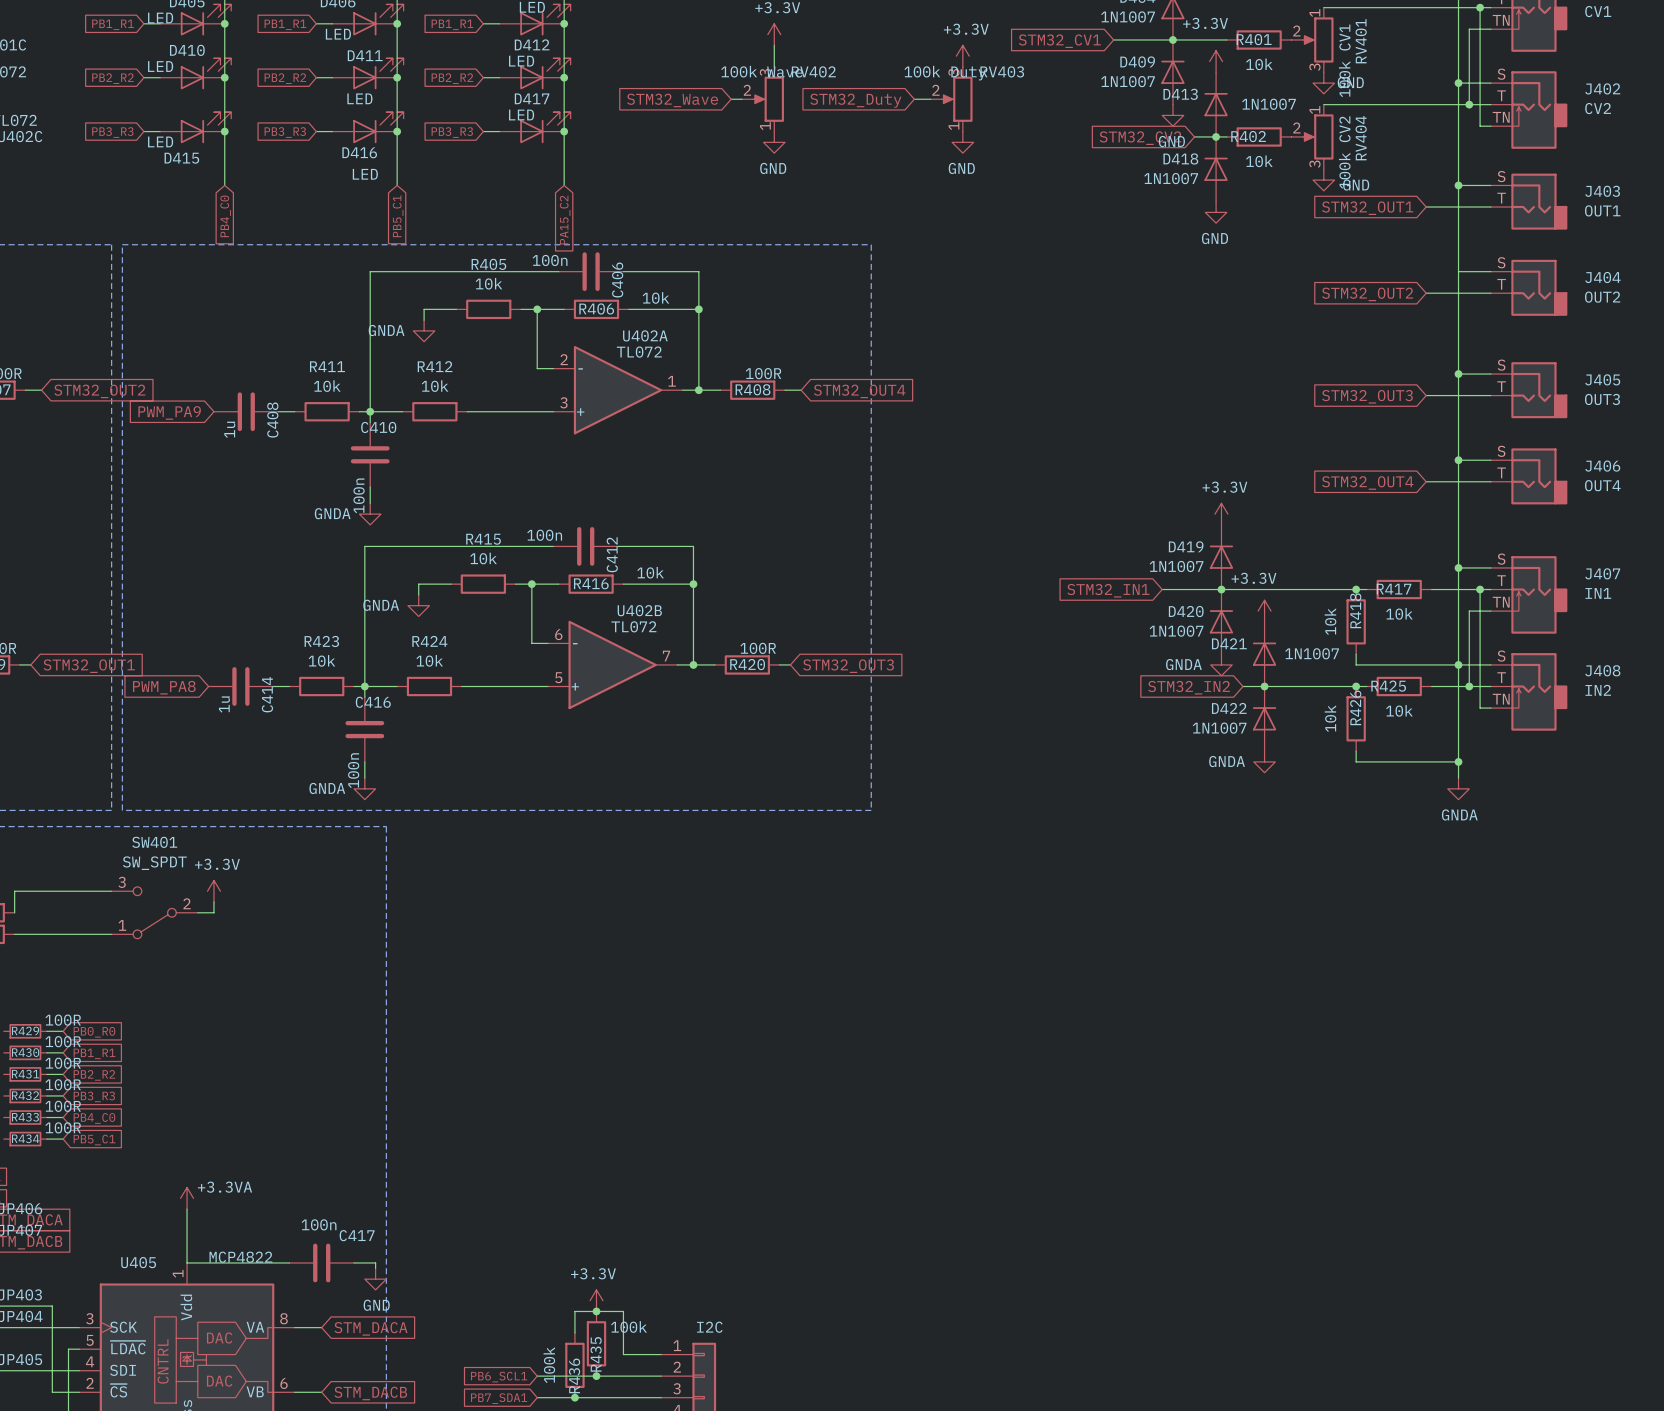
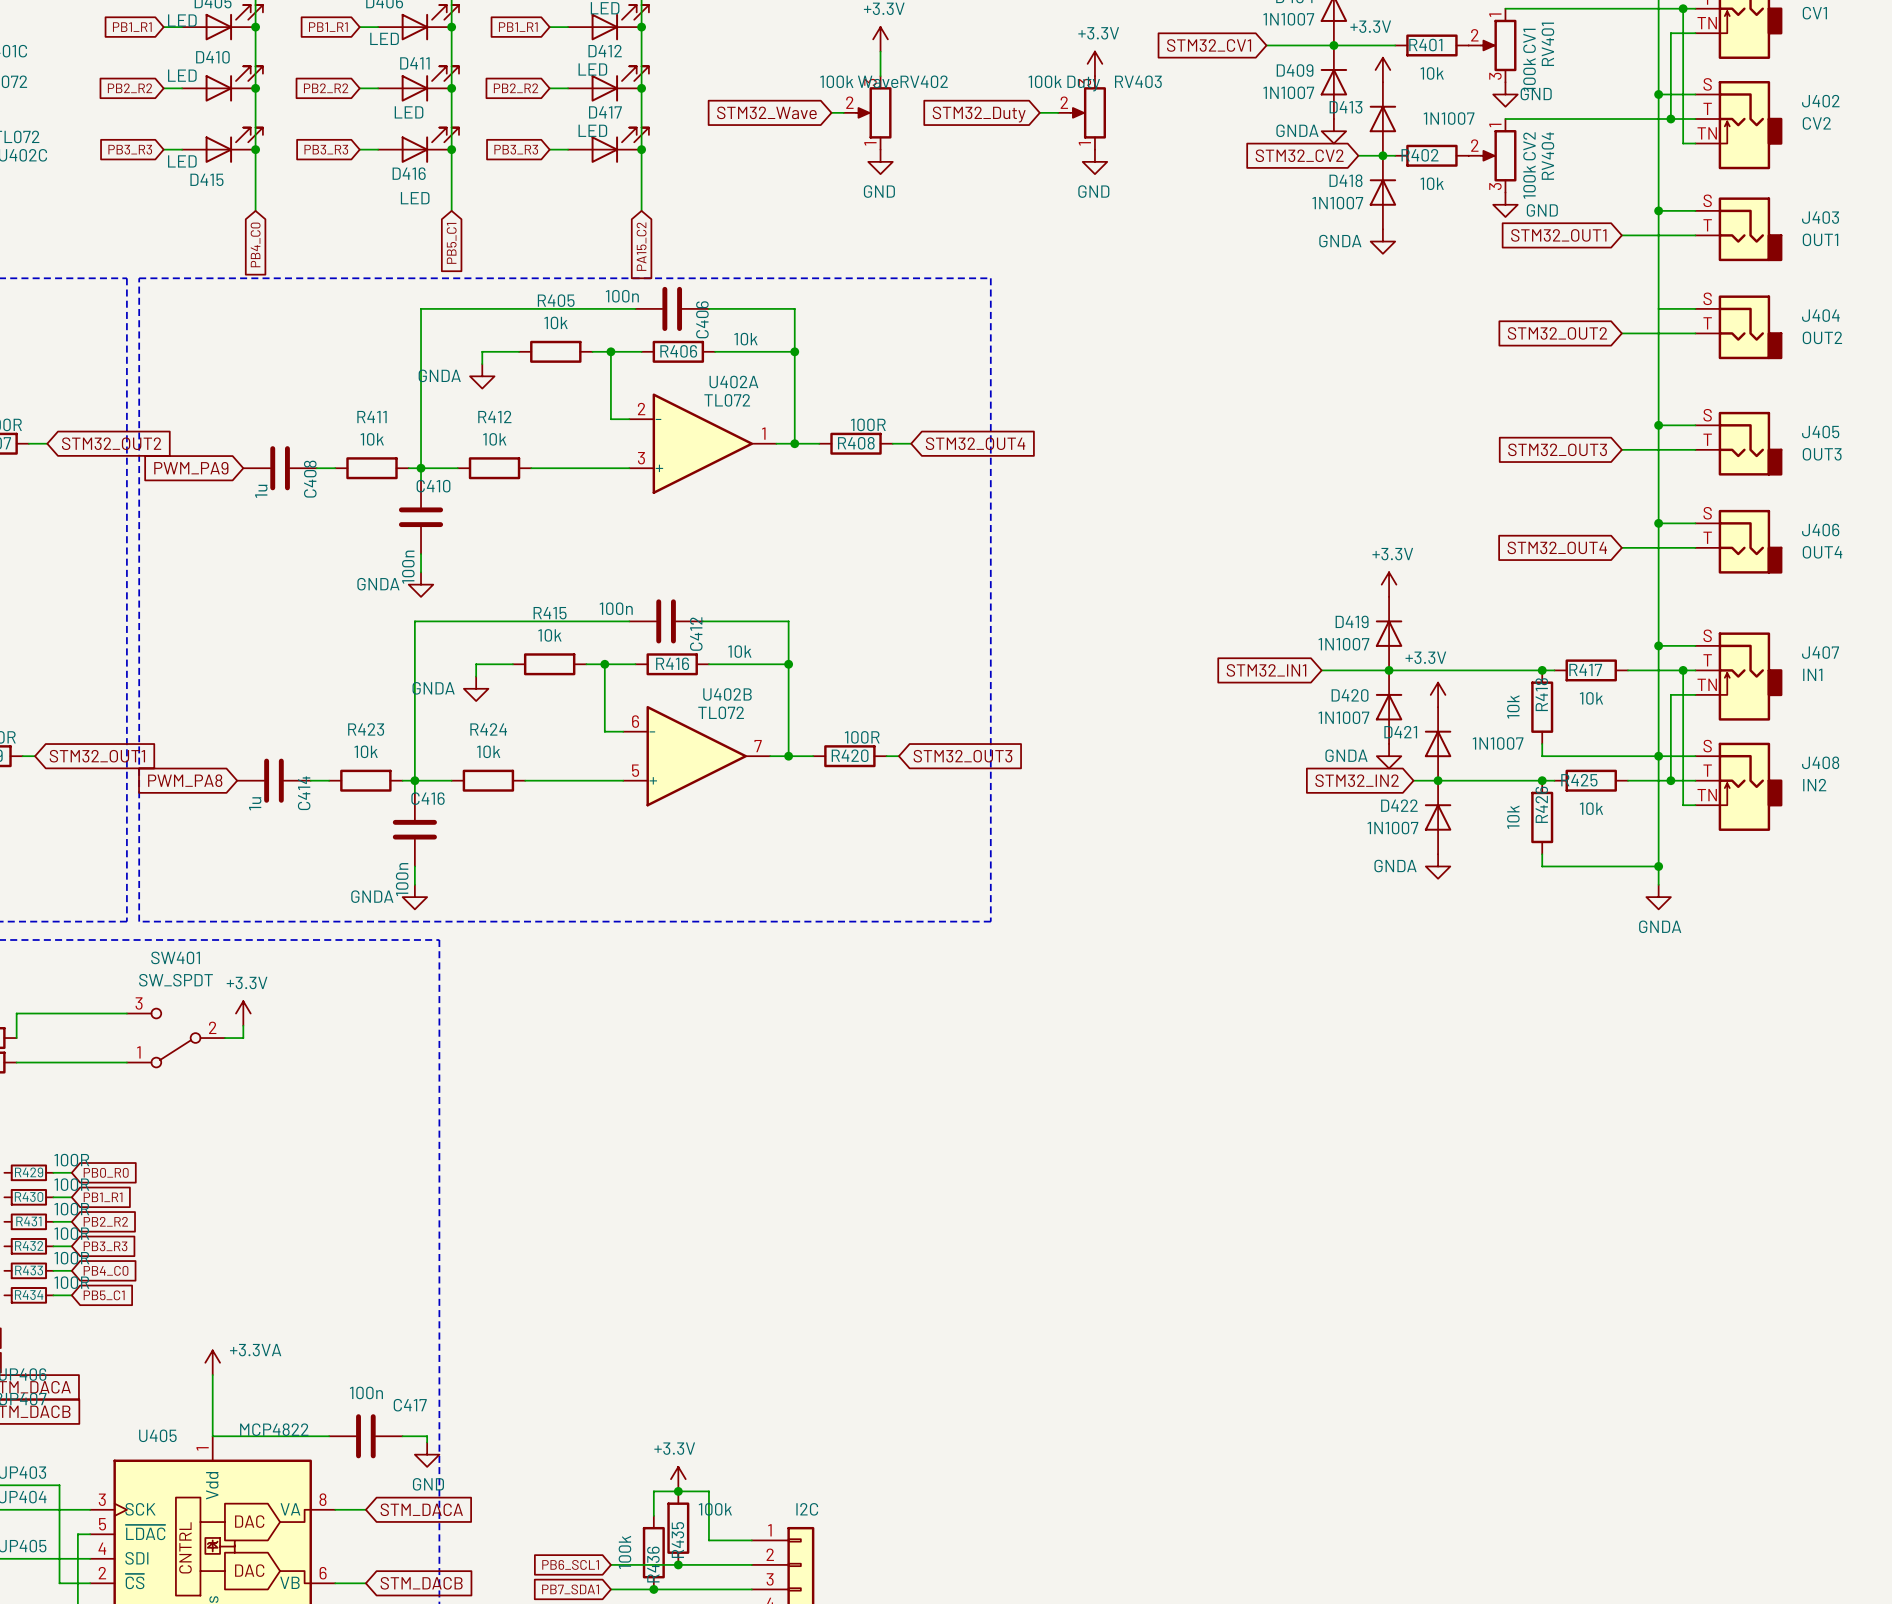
power symbol: GND (1172, 115) -> GNDA (1333, 131)
power symbol: GND (1216, 212) -> GNDA (1382, 241)

